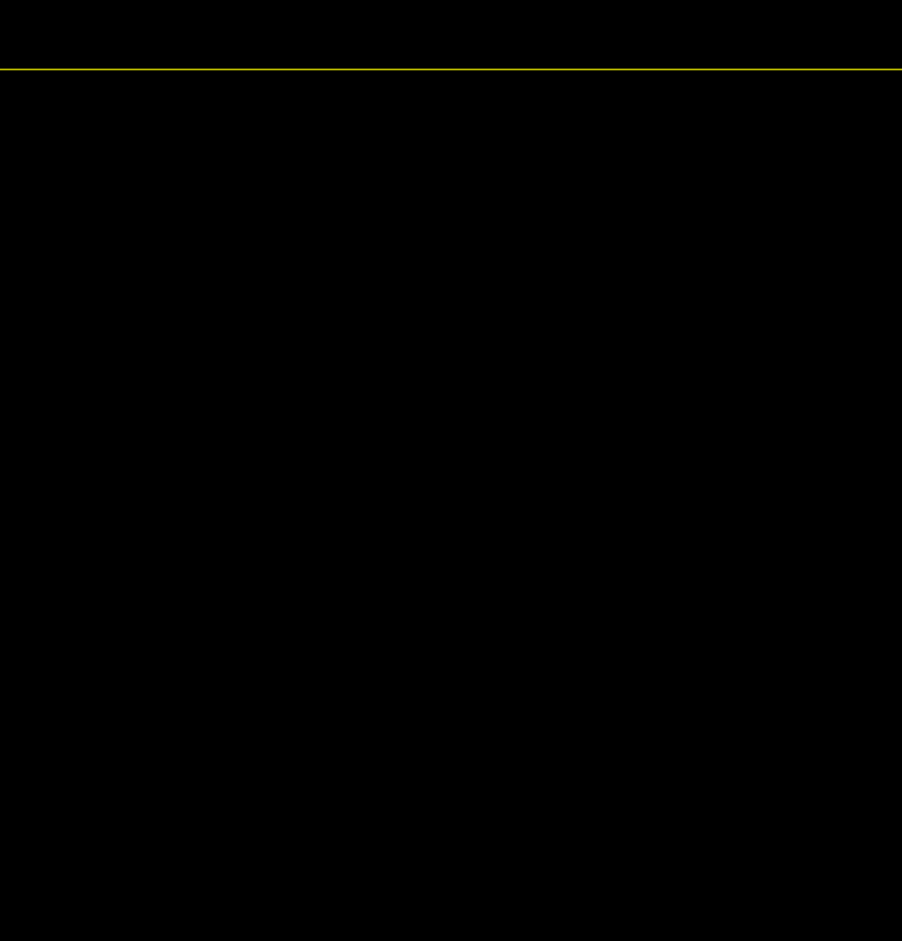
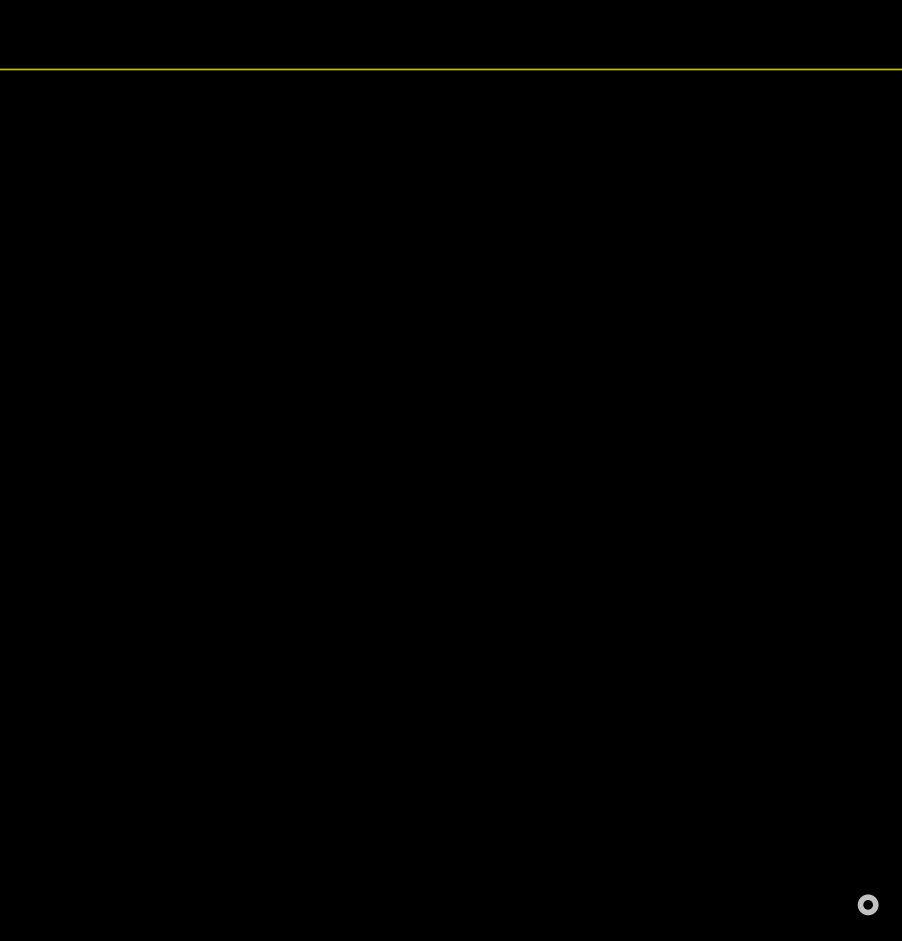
via: none -> (868, 904)

